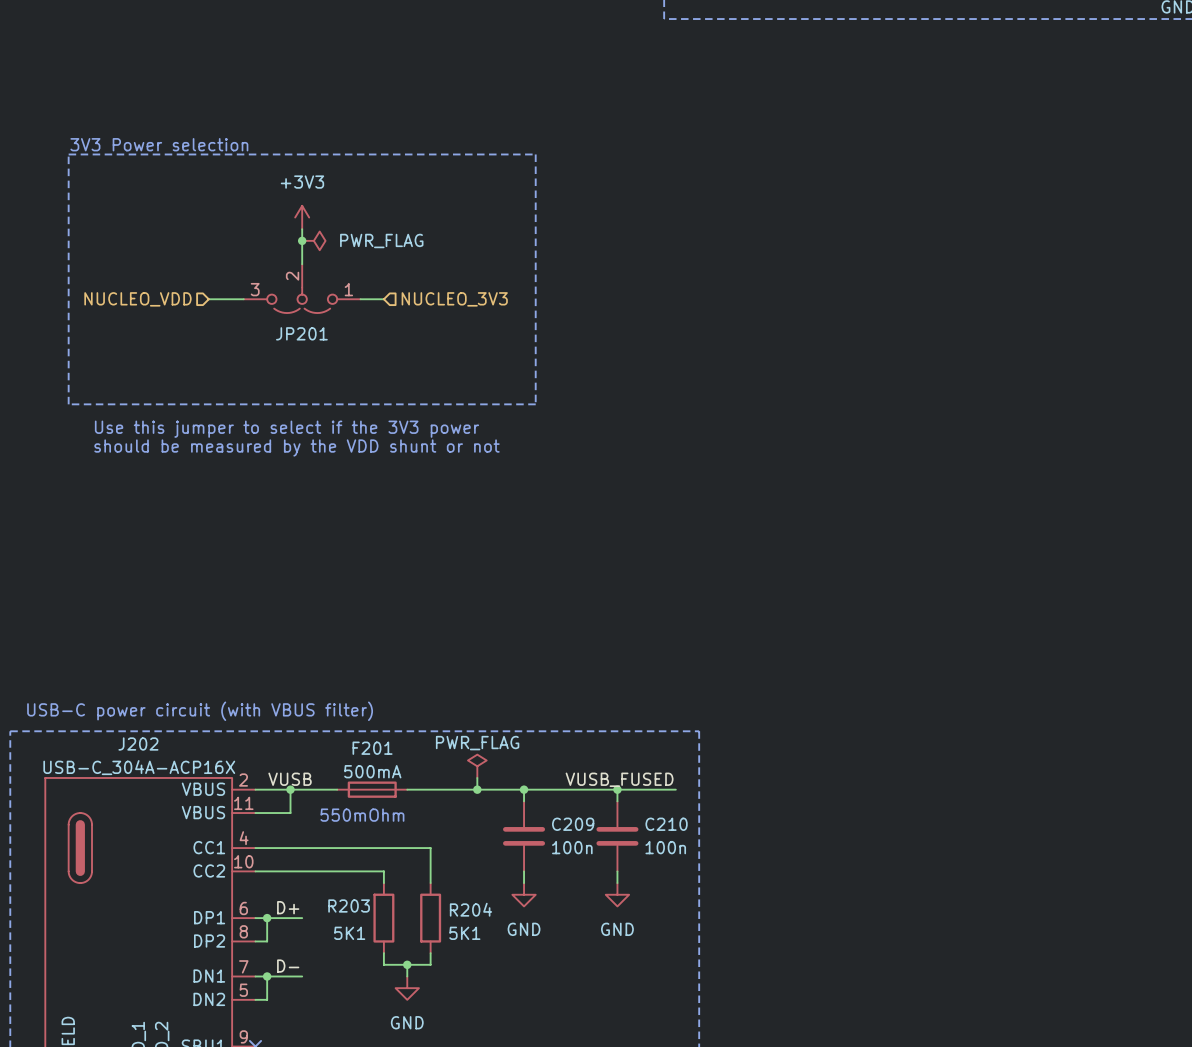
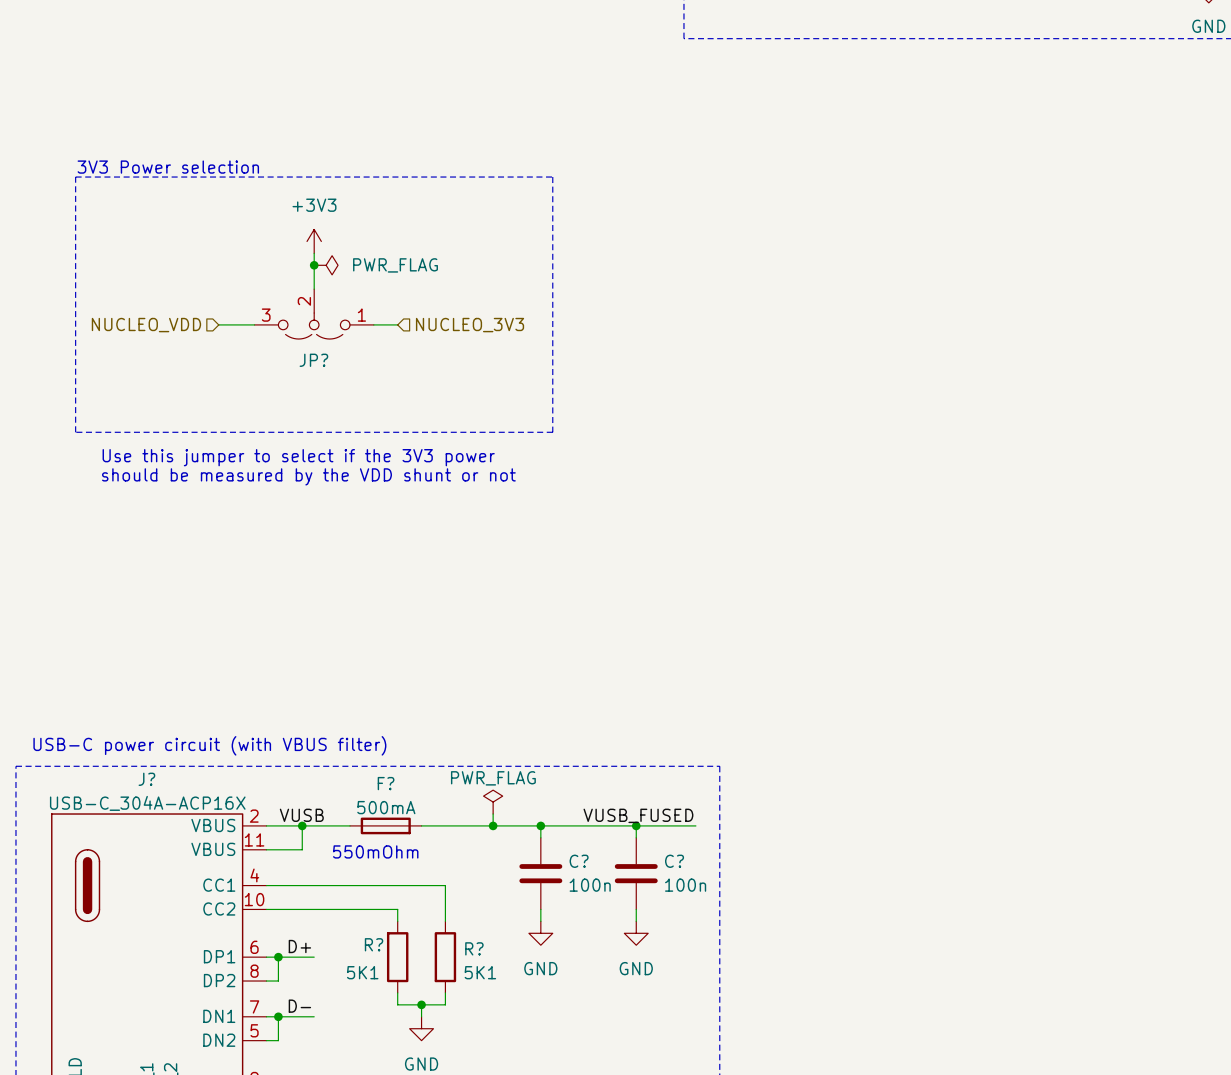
JP201 name: JP201 (301, 333) -> JP? (313, 360)
J202 name: J202 (138, 744) -> J? (146, 779)
F201 name: F201 (372, 748) -> F? (386, 783)
C209 name: C209 (573, 824) -> C? (579, 861)
C210 name: C210 (666, 824) -> C? (674, 861)
R203 name: R203 (349, 905) -> R? (374, 944)
R204 name: R204 (470, 909) -> R? (474, 948)

